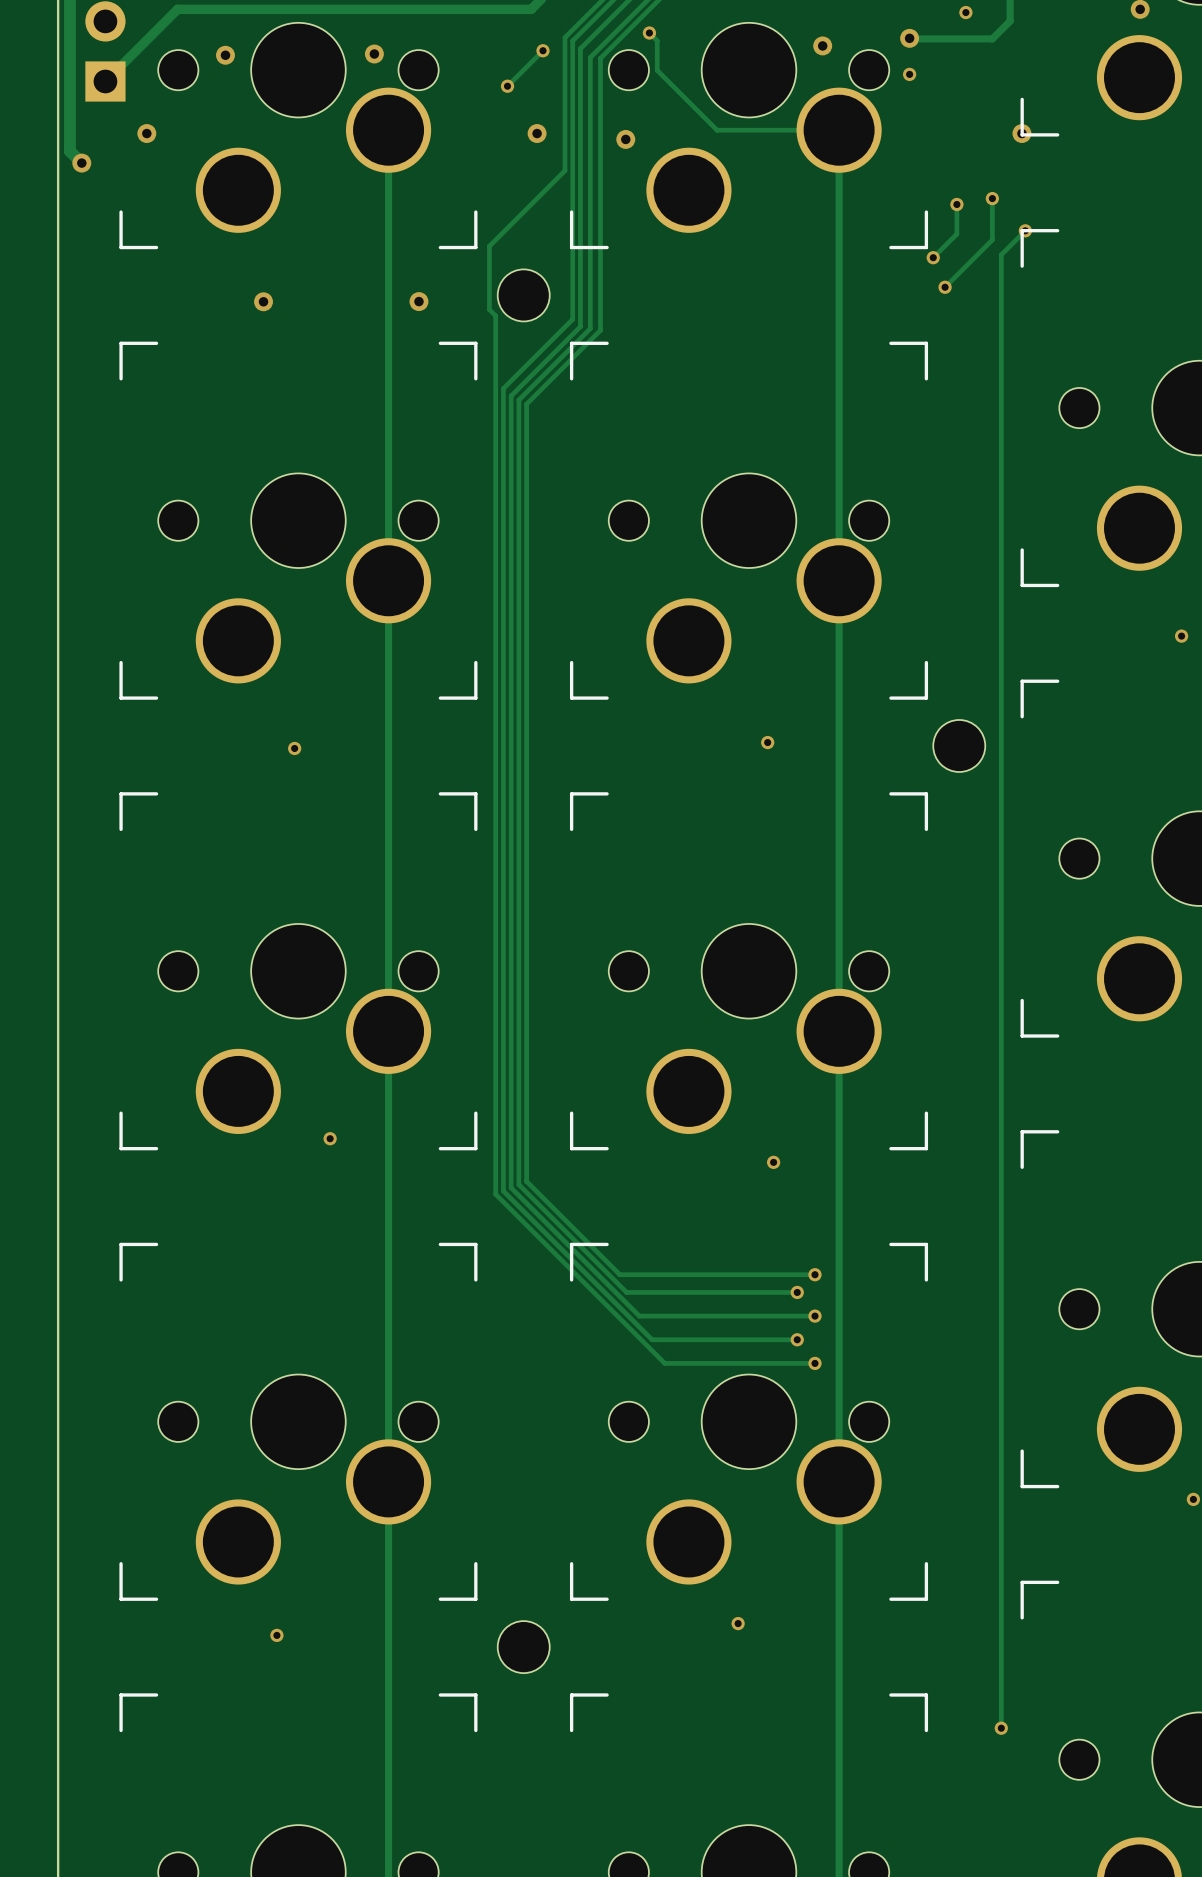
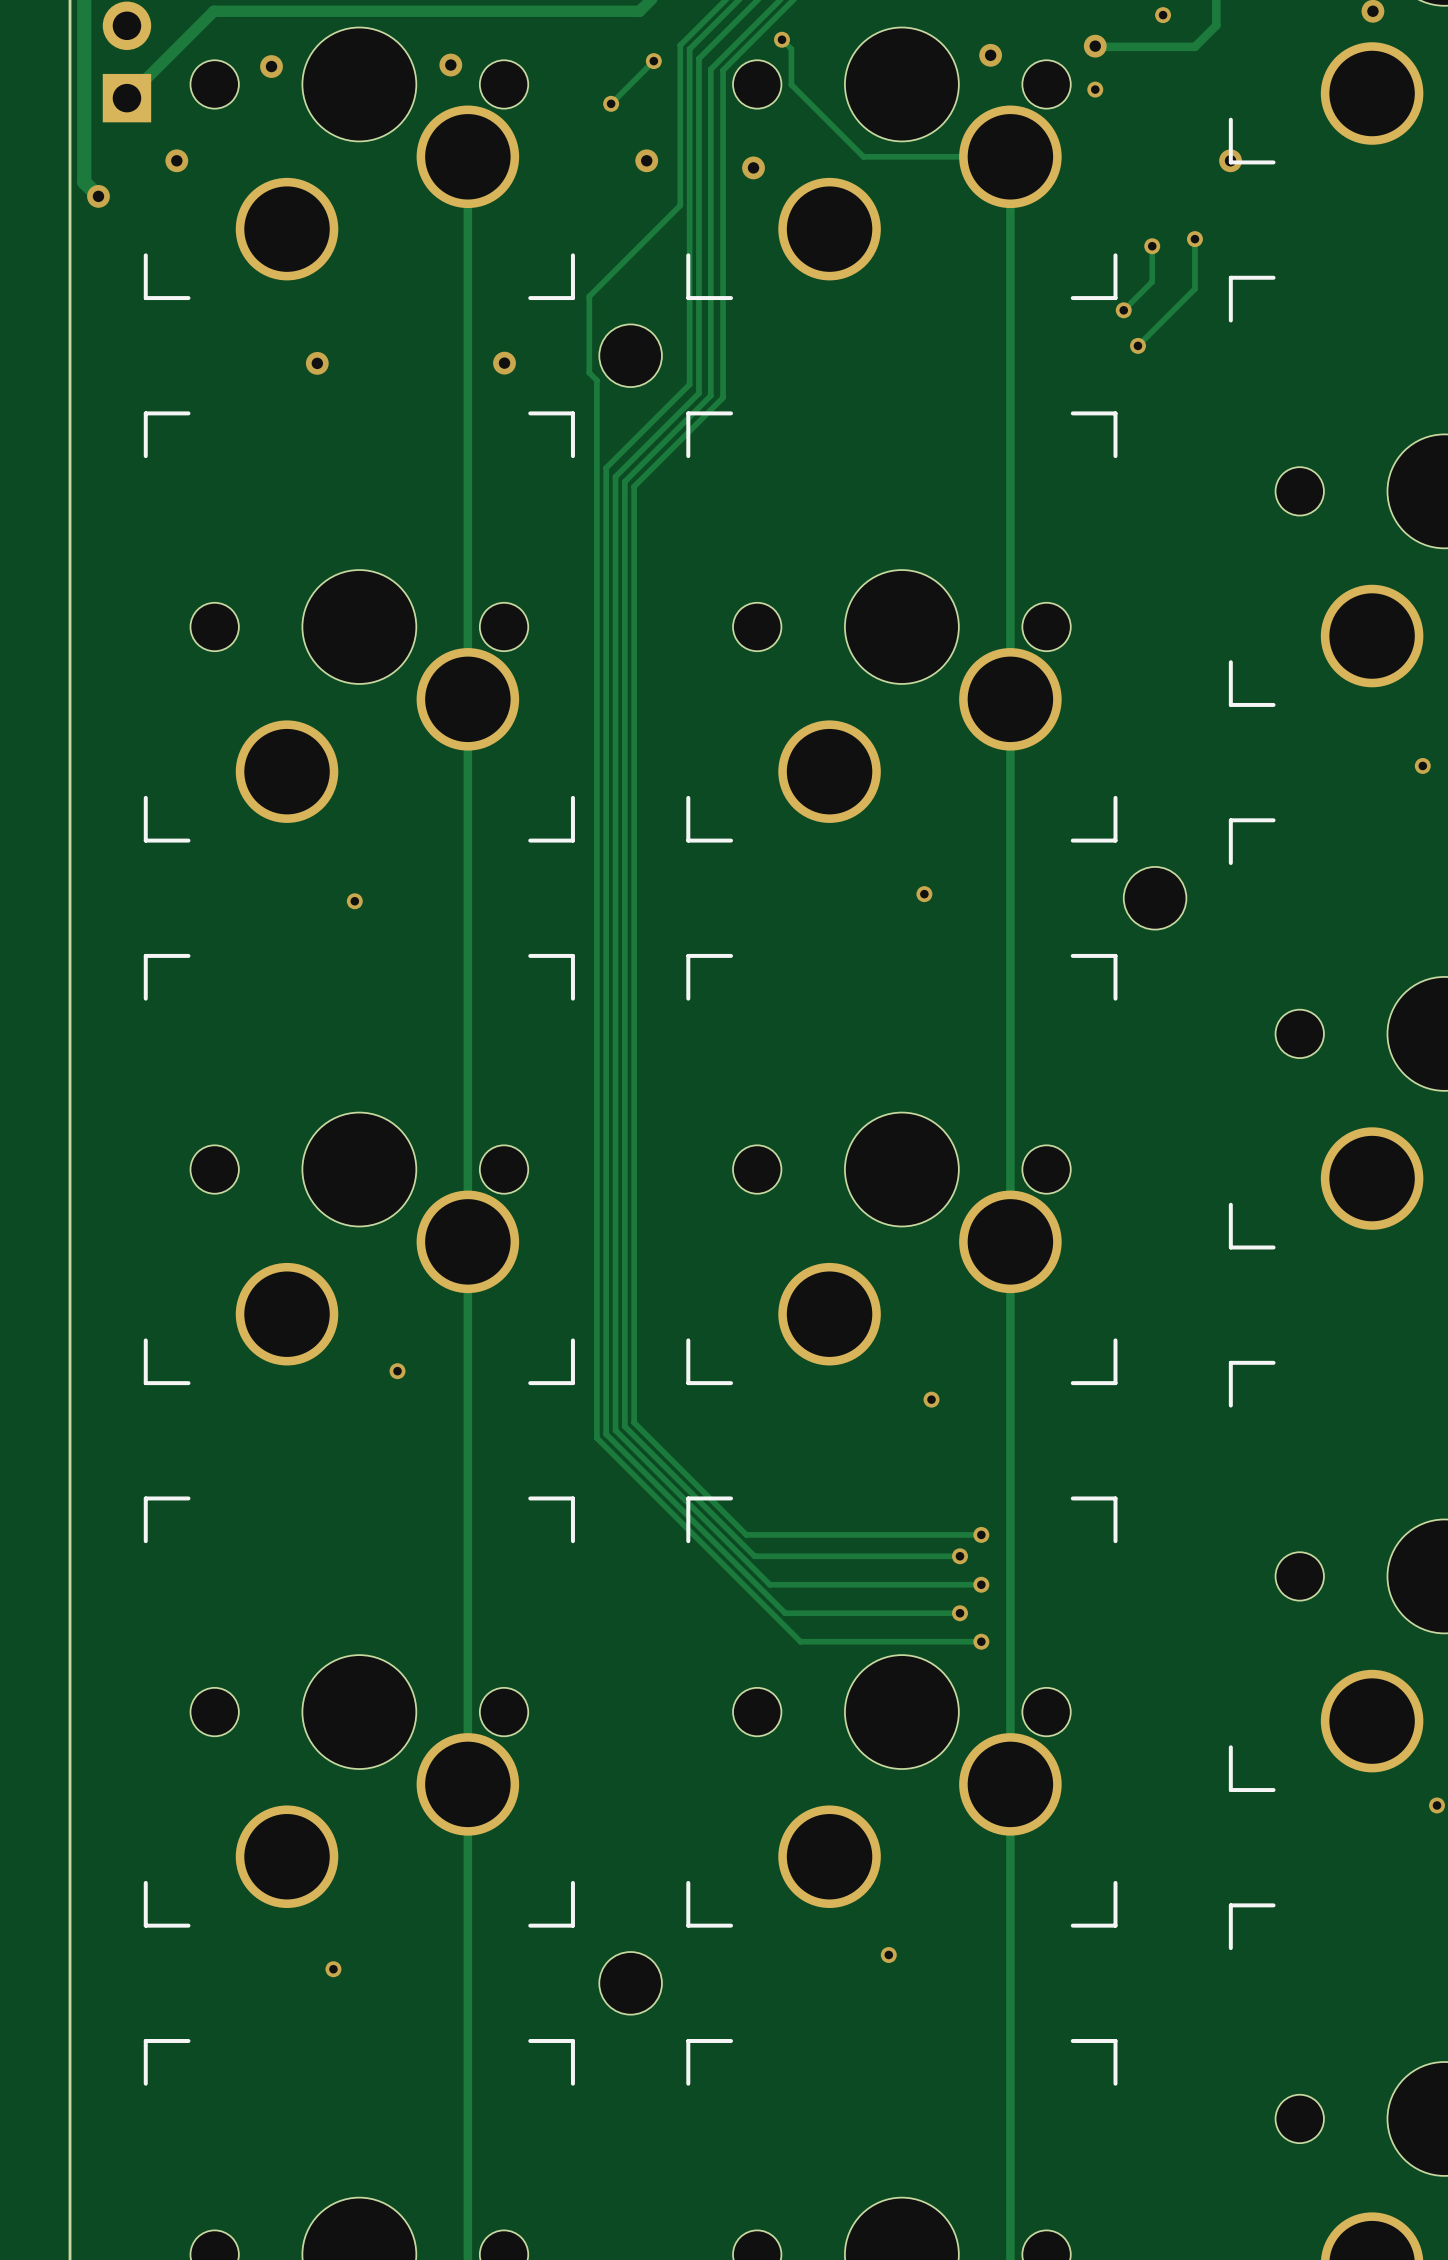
track: (1025, 230) (1001, 254) (1001, 1728) -> none
via: (1025, 230) -> none
via: (1001, 1728) -> none

